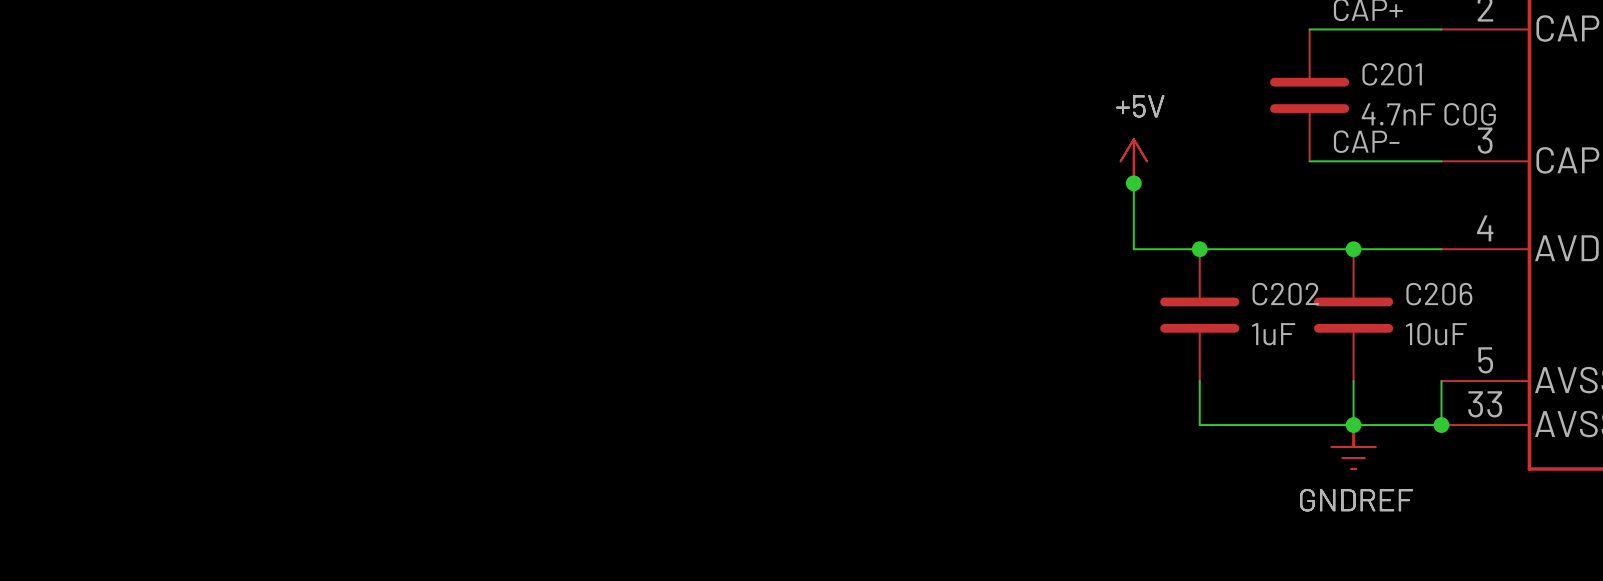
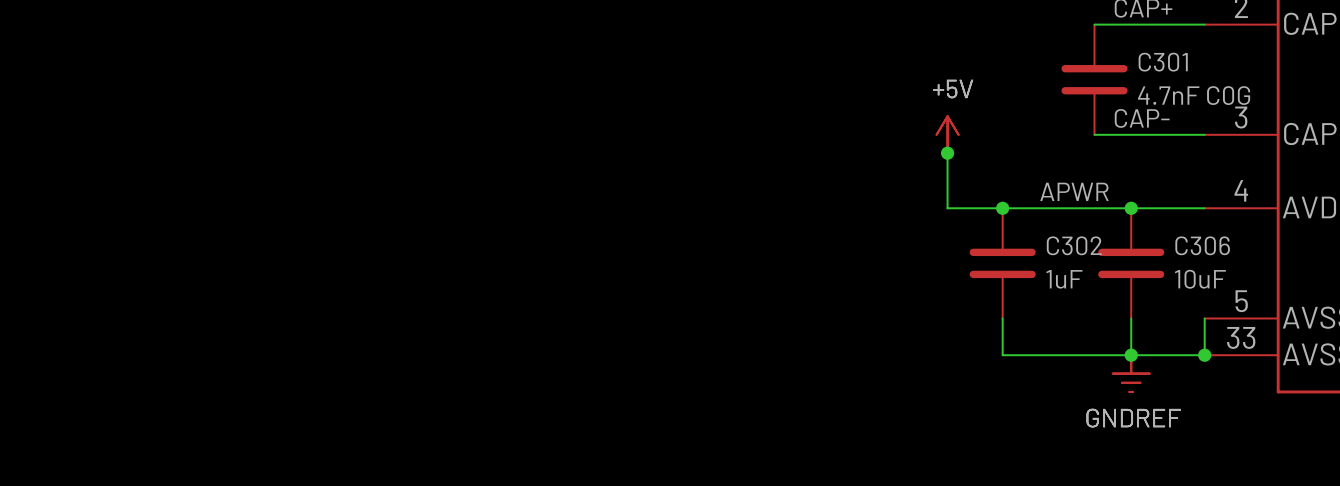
C201 name: C201 (1392, 74) -> C301 (1163, 62)
label: none -> APWR (1074, 191)
C202 name: C202 (1285, 294) -> C302 (1074, 245)
C206 name: C206 (1439, 294) -> C306 (1202, 245)

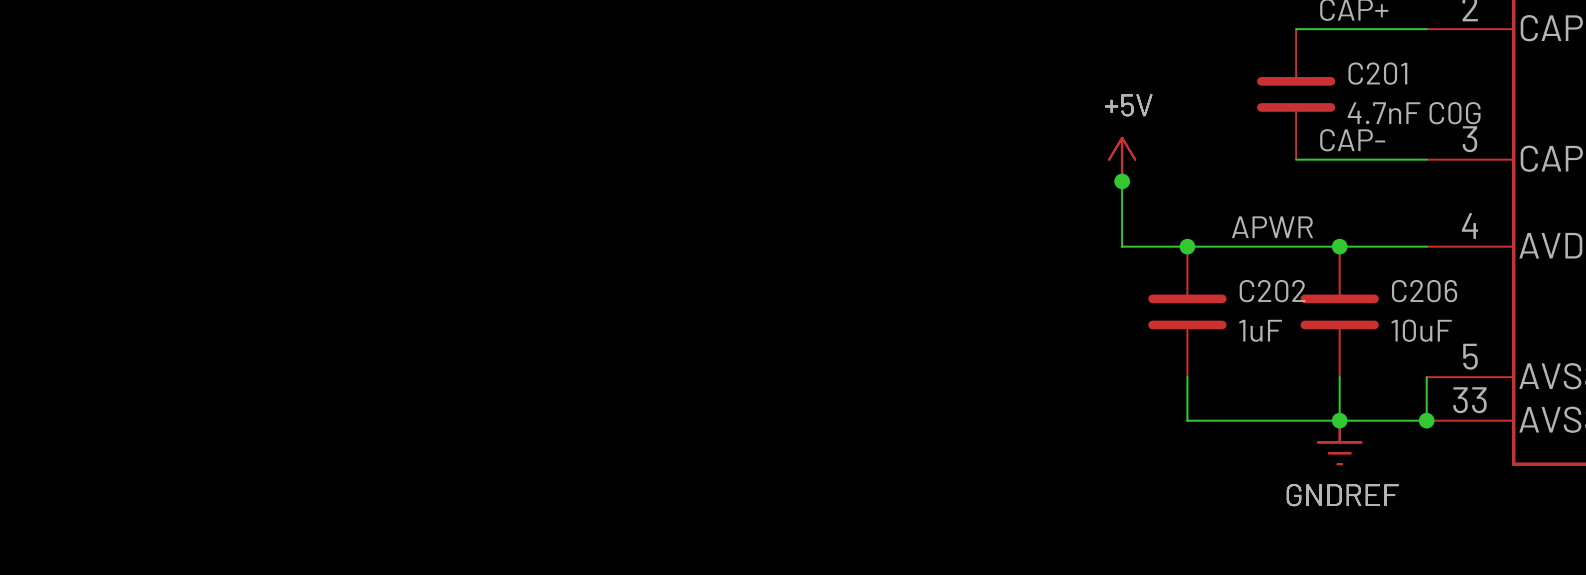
C301 name: C301 (1163, 62) -> C201 (1377, 73)
C302 name: C302 (1074, 245) -> C202 (1272, 291)
C306 name: C306 (1202, 245) -> C206 (1424, 291)

